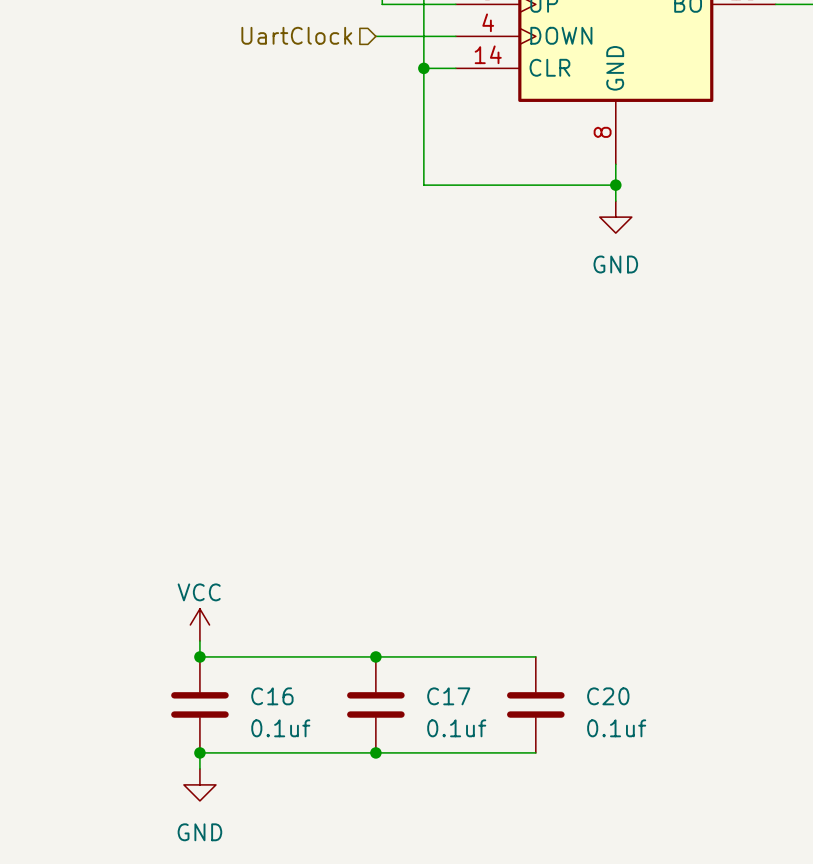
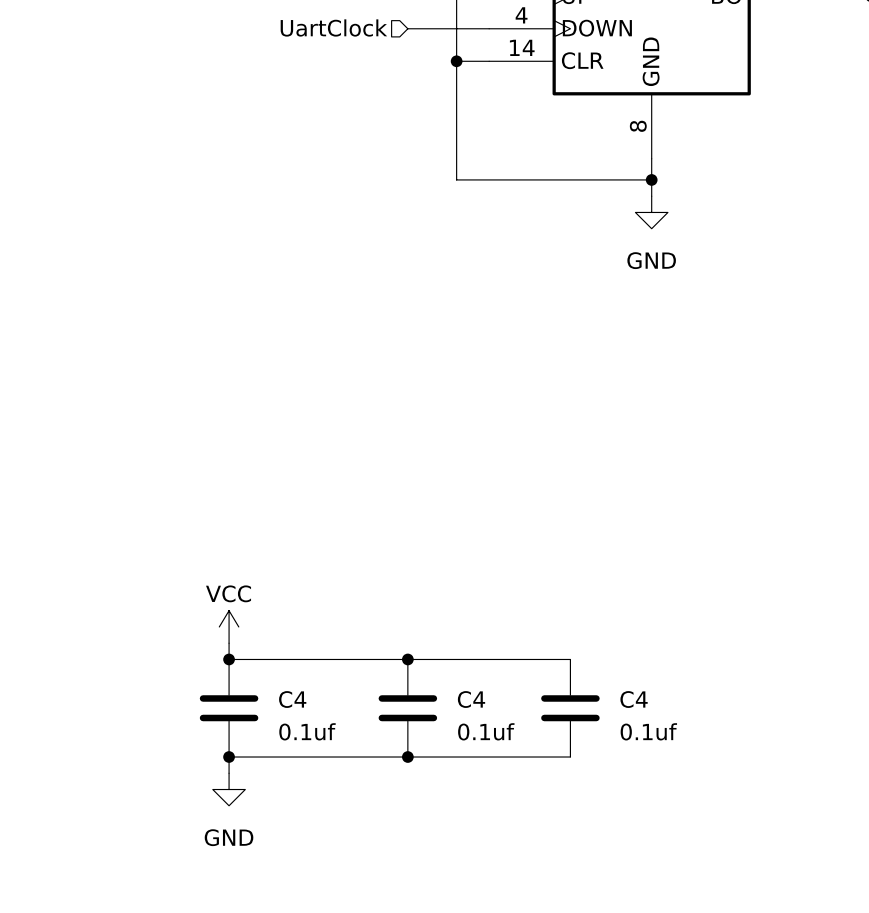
C16 name: C16 (272, 696) -> C4 (292, 699)
C17 name: C17 (448, 696) -> C4 (471, 699)
C20 name: C20 (608, 696) -> C4 (634, 699)

